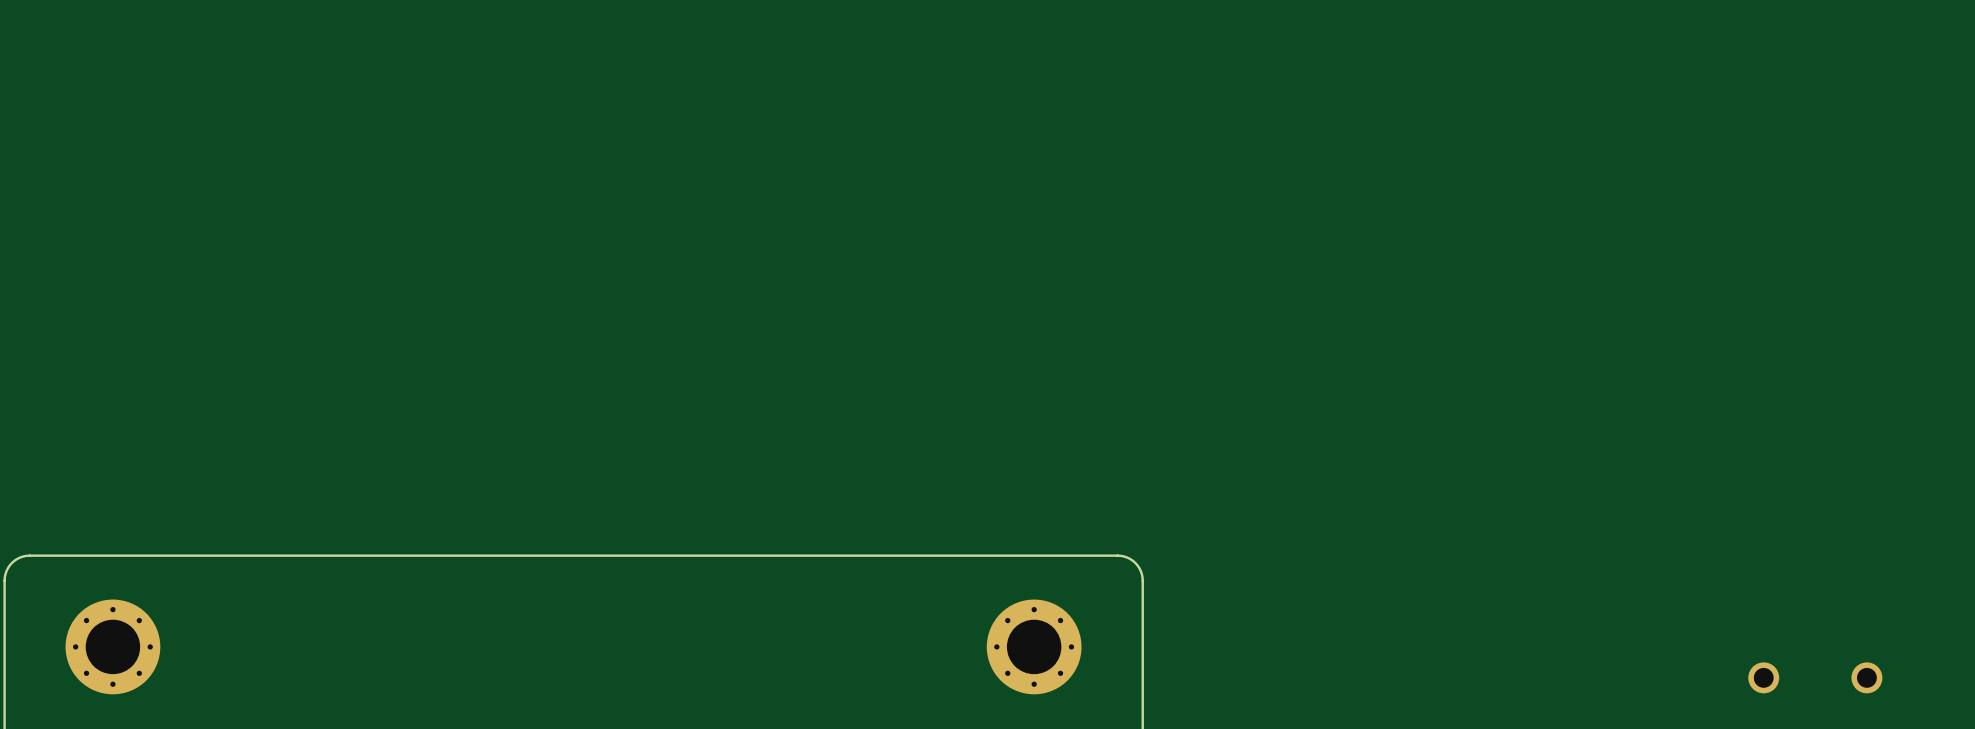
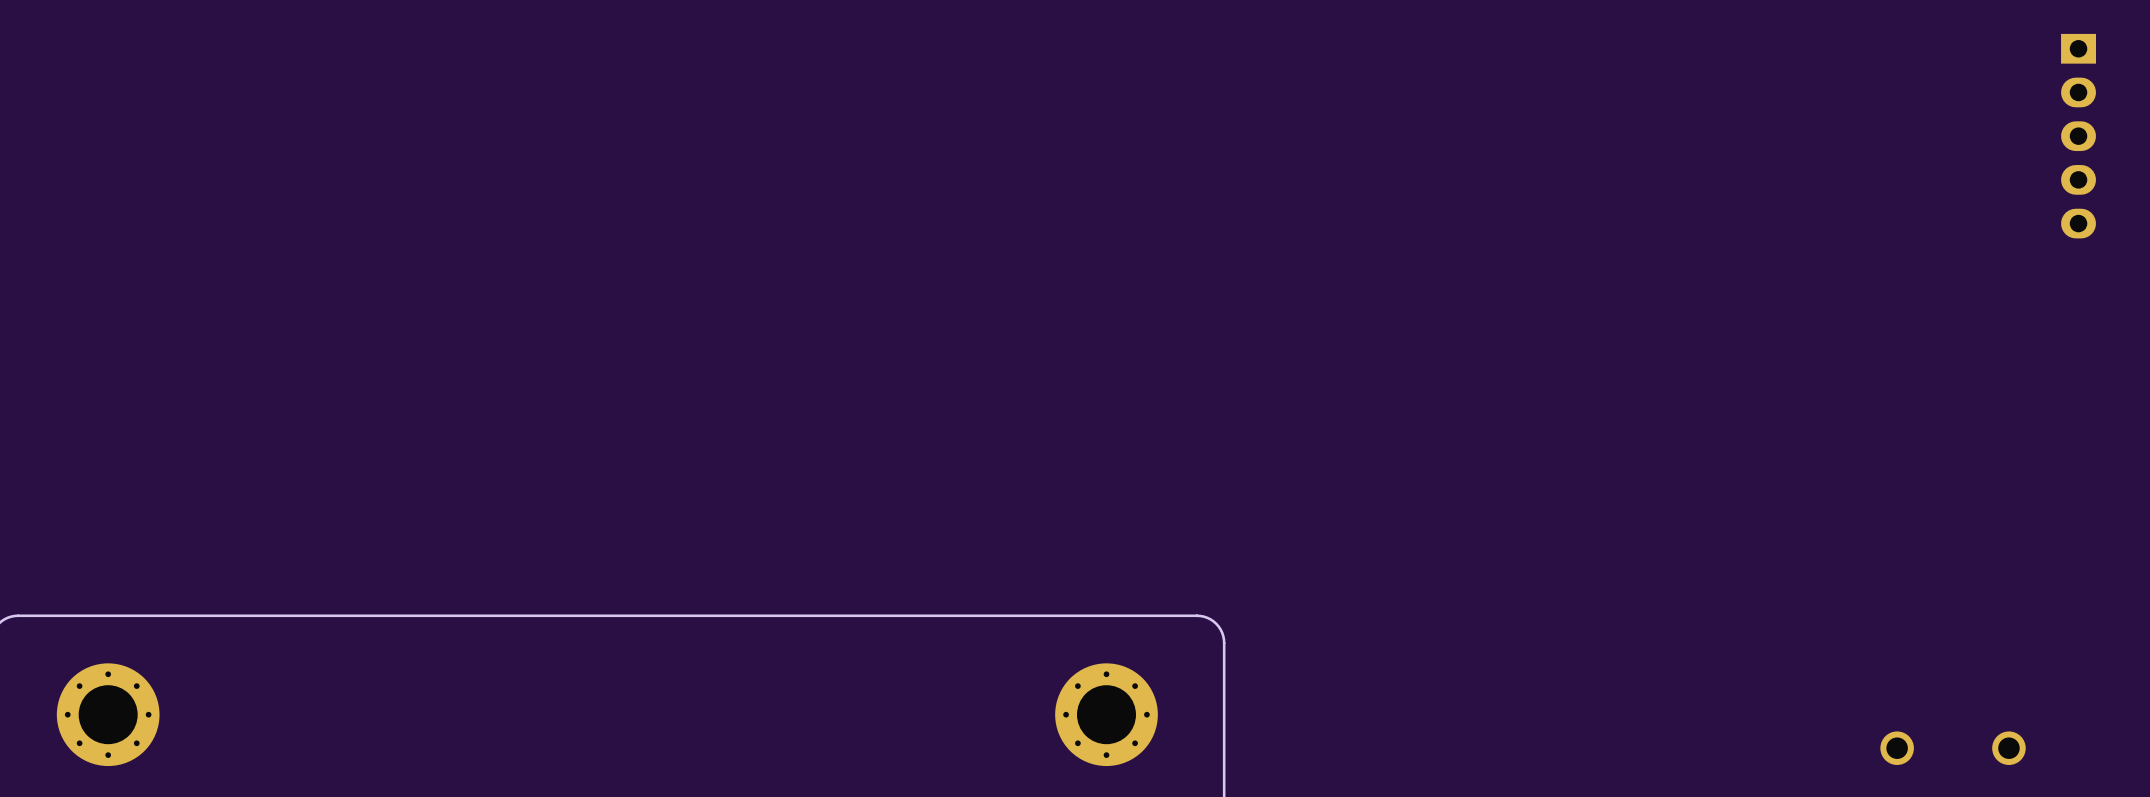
part: none -> (2078, 136)

